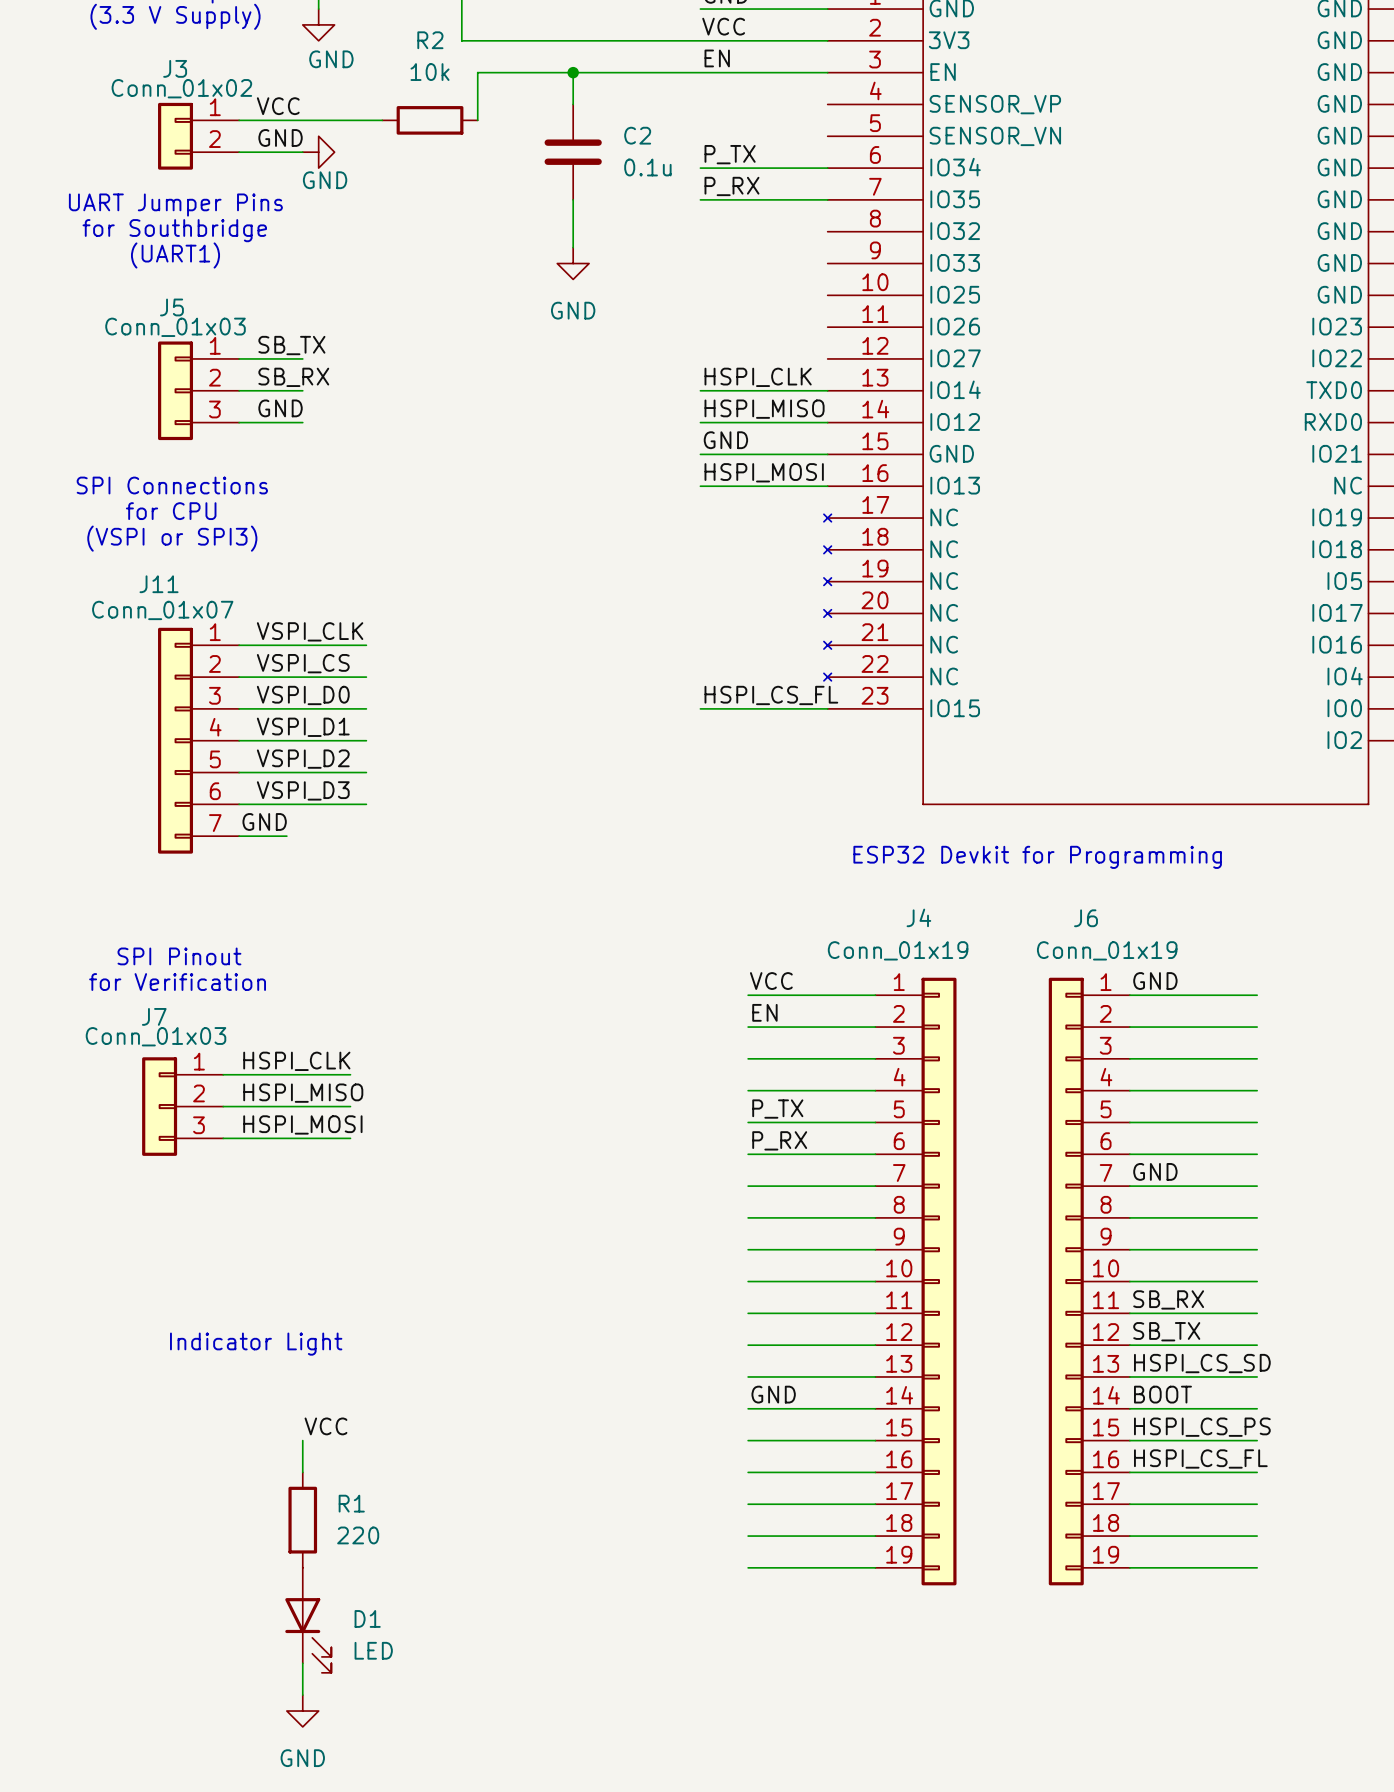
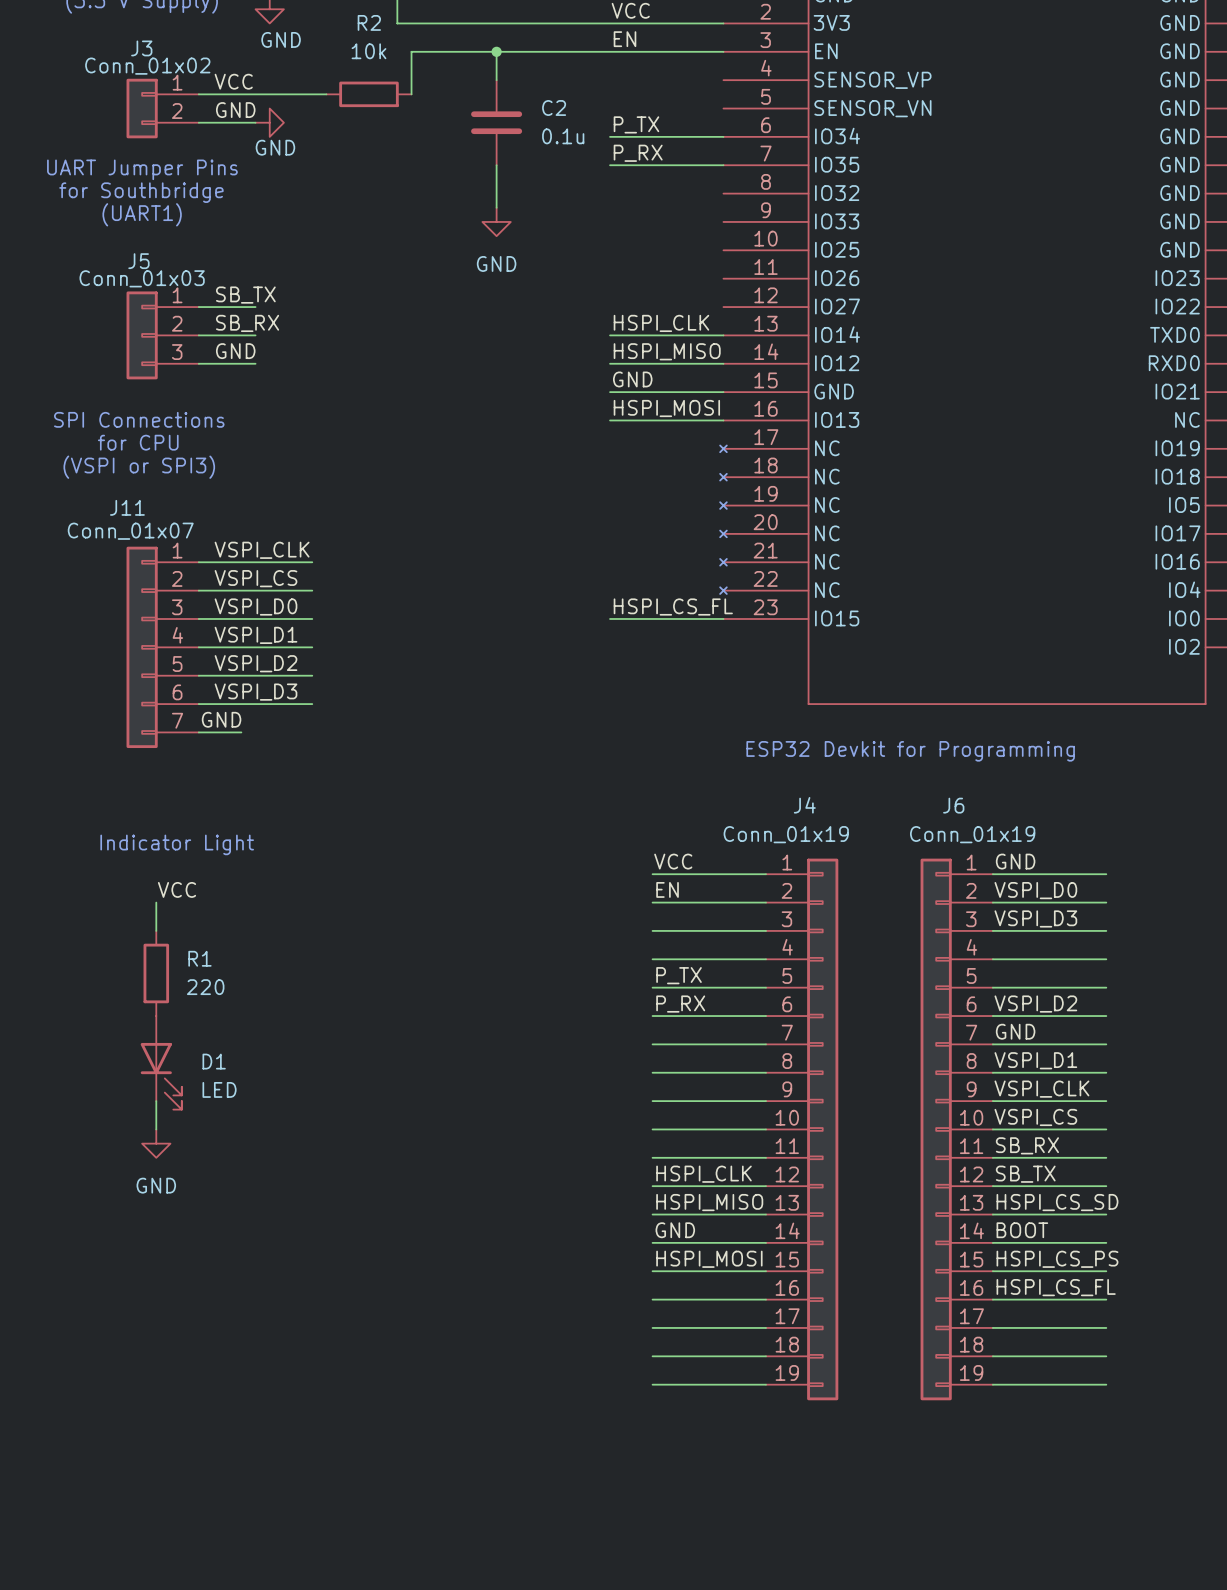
text: SPI Pinout (179, 956) -> none
text: none -> Indicator Light (177, 844)
text: for Verification (177, 982) -> none
label: none -> VCC (176, 889)
label: none -> VSPI_D0 (1035, 890)
wire: none -> (156, 902) (156, 930)
label: none -> VSPI_D3 (1035, 918)
label: HSPI_CLK (296, 1061) -> none
wire: (223, 1074) (350, 1074) -> none
label: HSPI_MISO (303, 1093) -> none
J7: Conn_01x03 (182, 1106) -> none
wire: (223, 1106) (350, 1106) -> none
label: HSPI_MOSI (302, 1124) -> none
wire: (223, 1138) (350, 1138) -> none
label: none -> VSPI_D2 (1035, 1004)
label: none -> VSPI_D1 (1035, 1060)
label: none -> VSPI_CLK (1041, 1089)
label: none -> VSPI_CS (1035, 1117)
power symbol: none -> GND (156, 1143)
label: none -> HSPI_CLK (704, 1174)
text: Indicator Light (256, 1344) -> none
label: none -> HSPI_MISO (709, 1202)
label: VCC (325, 1426) -> none
label: none -> HSPI_MOSI (709, 1259)
wire: (302, 1440) (302, 1472) -> (156, 1101) (156, 1129)
R1 position: (302, 1520) -> (156, 973)
D1 position: (308, 1620) -> (161, 1062)
wire: (302, 1663) (302, 1695) -> none
power symbol: GND (302, 1711) -> none

